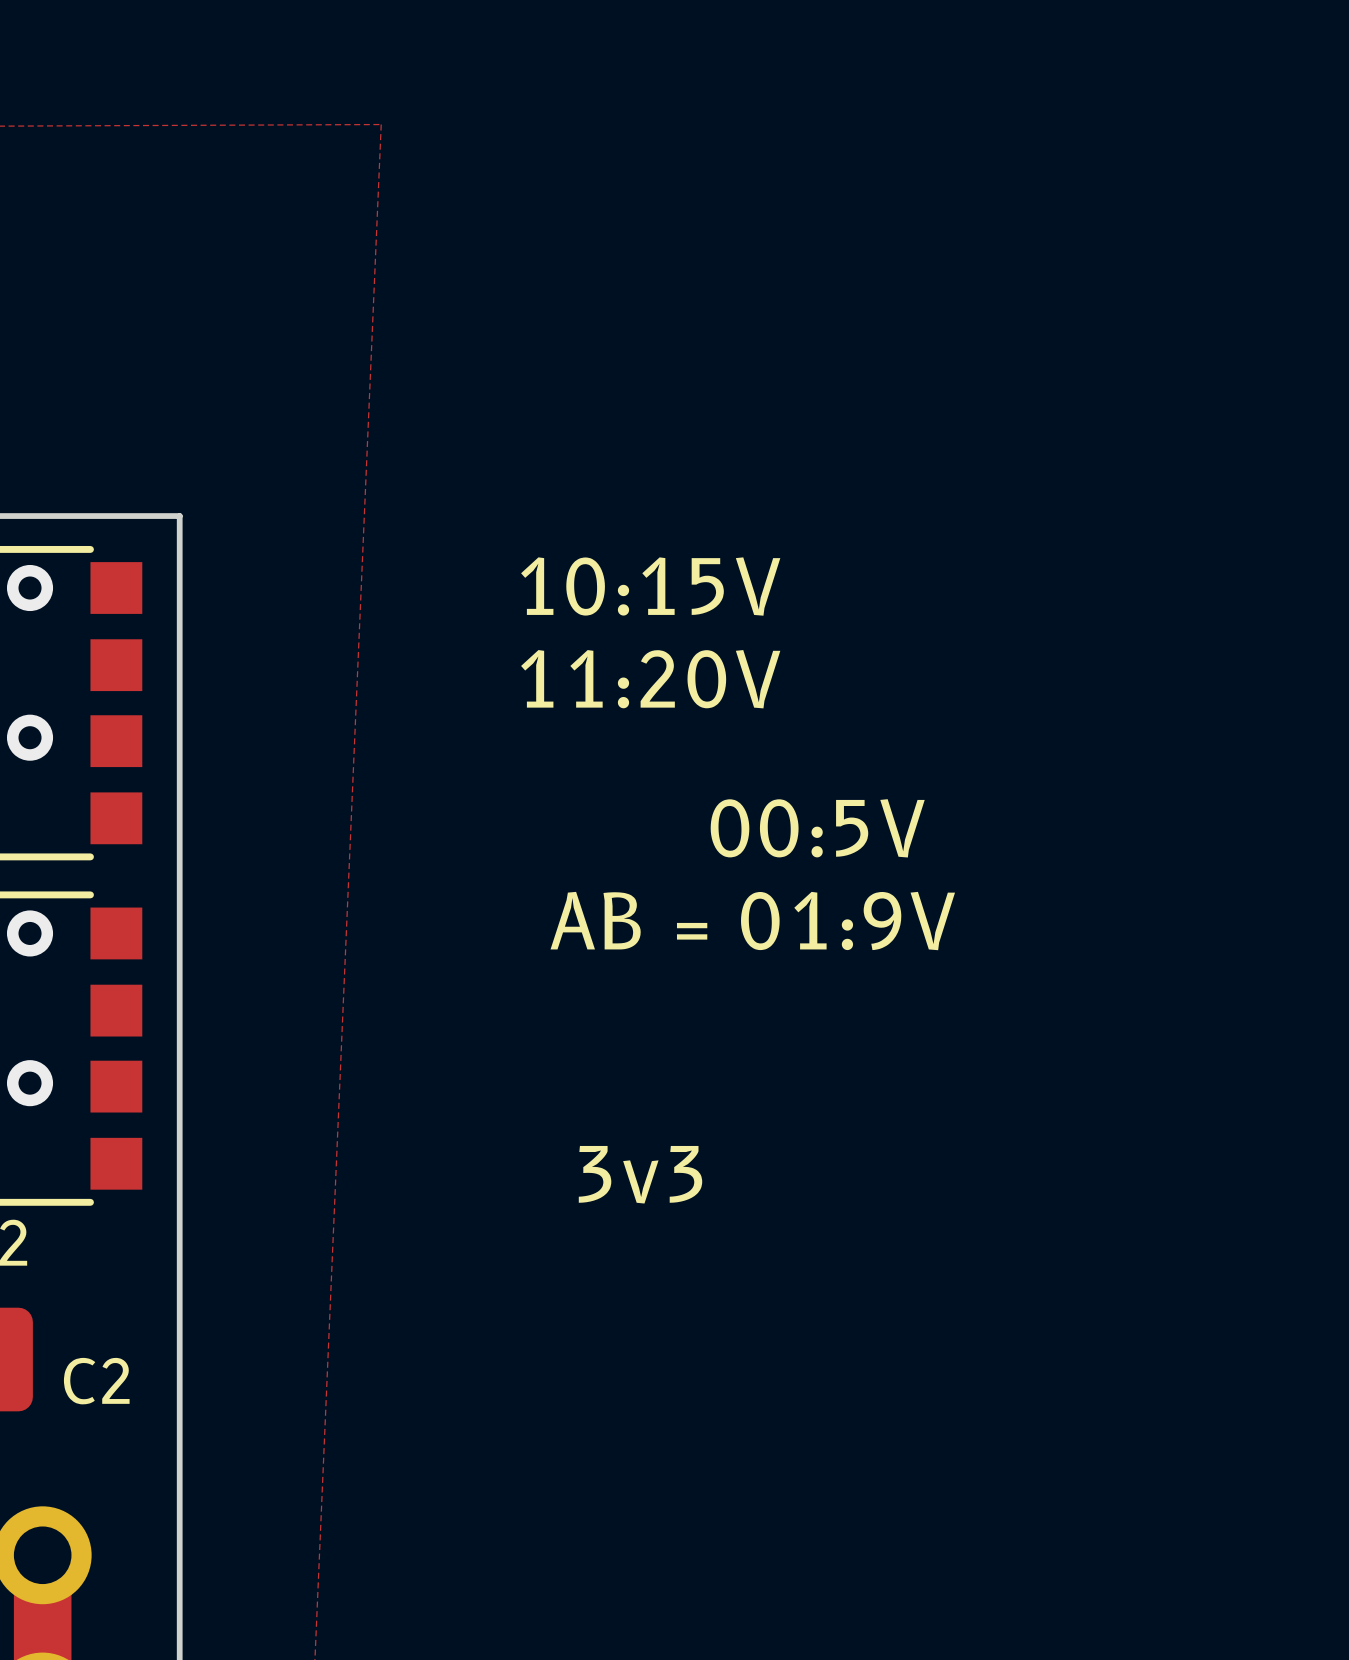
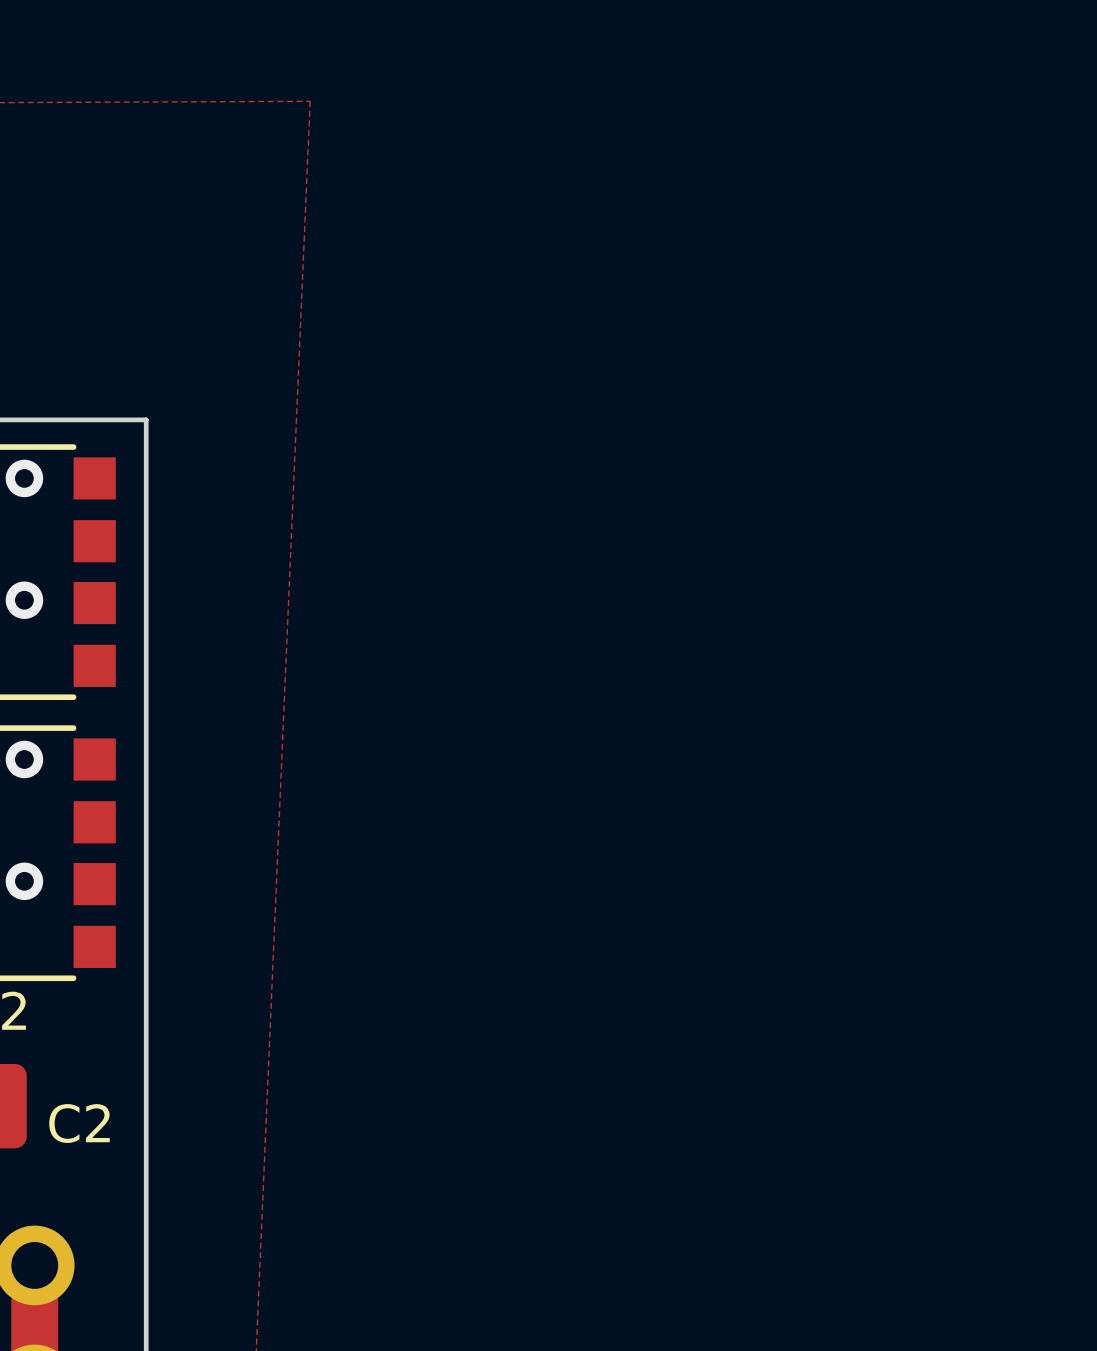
text: 10:15V (650, 586) -> none
text: 11:20V (650, 679) -> none
text: 00:5V (817, 828) -> none
text: AB = 01:9V (752, 921) -> none
text: 3v3 (640, 1174) -> none

